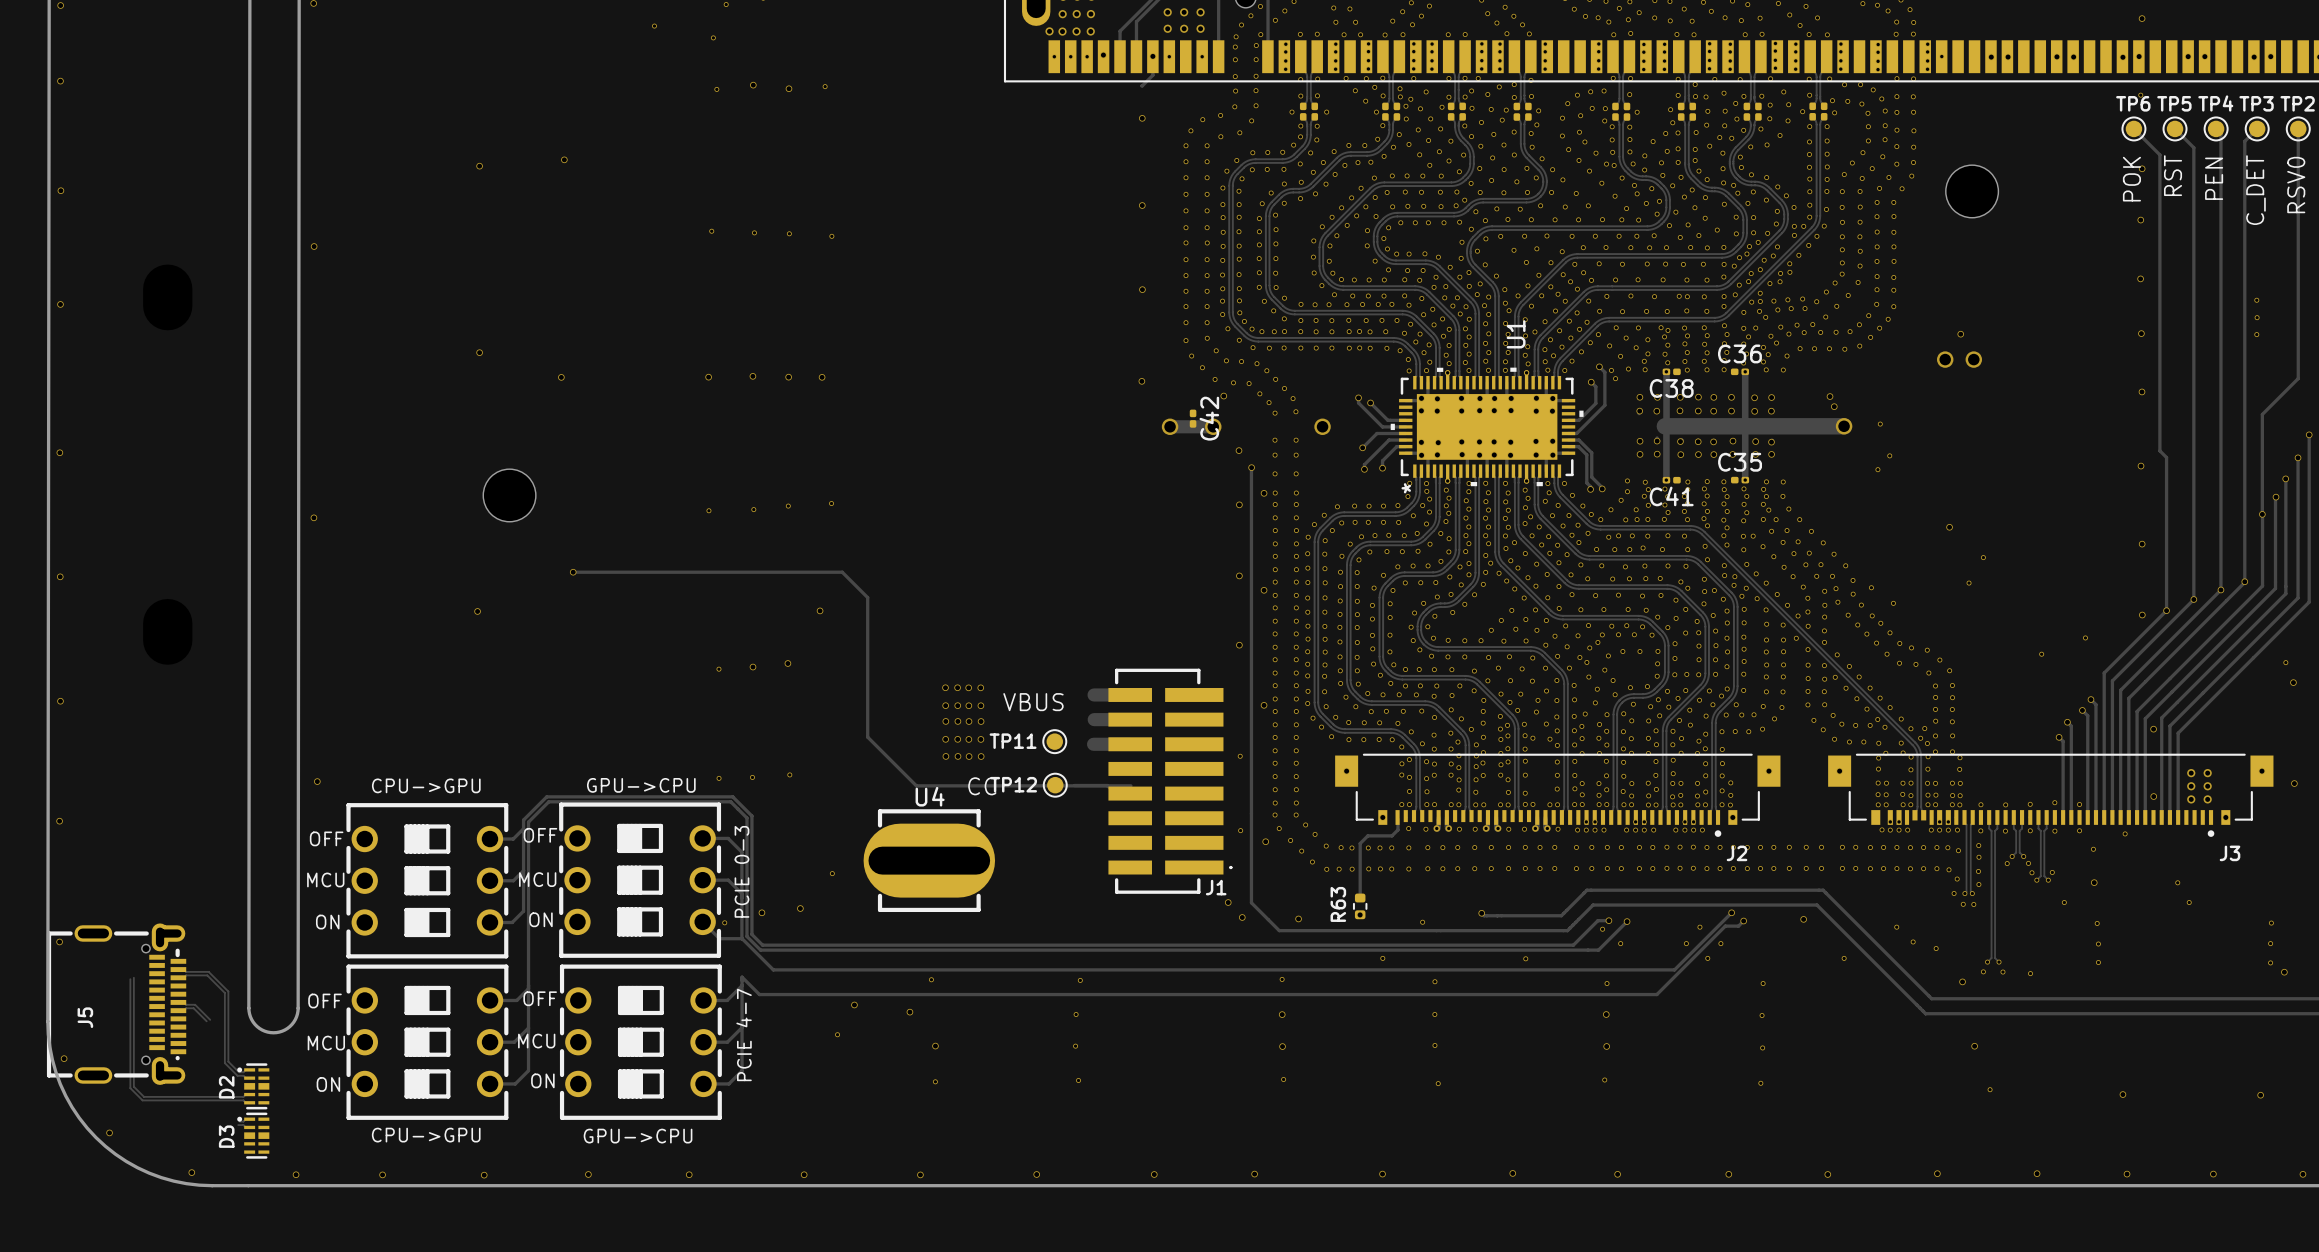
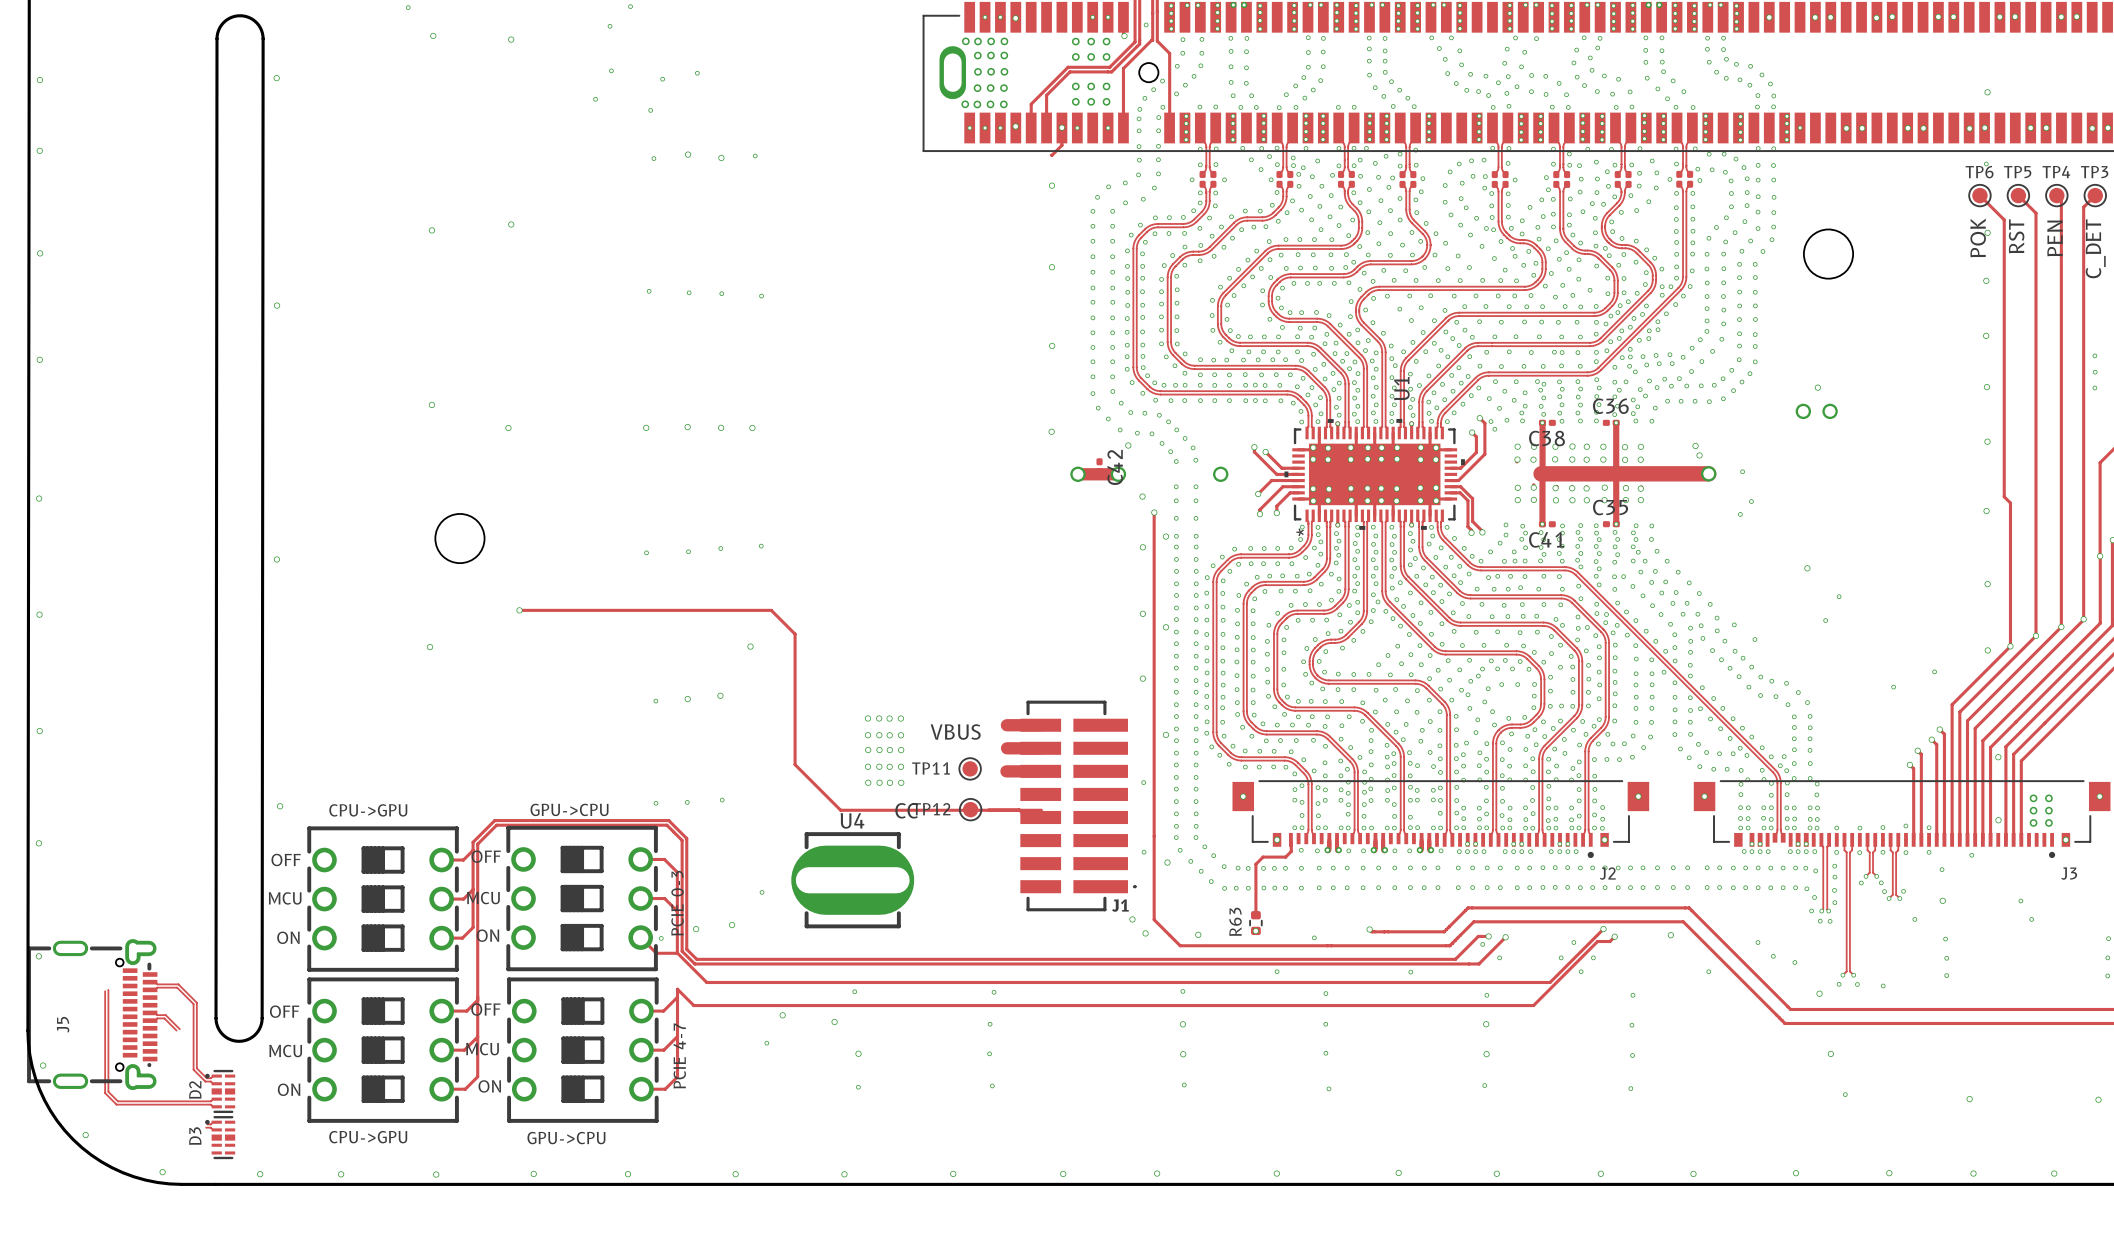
via: none -> (1417, 790)
via: none -> (1433, 790)
via: none -> (1433, 799)
via: none -> (1417, 800)

